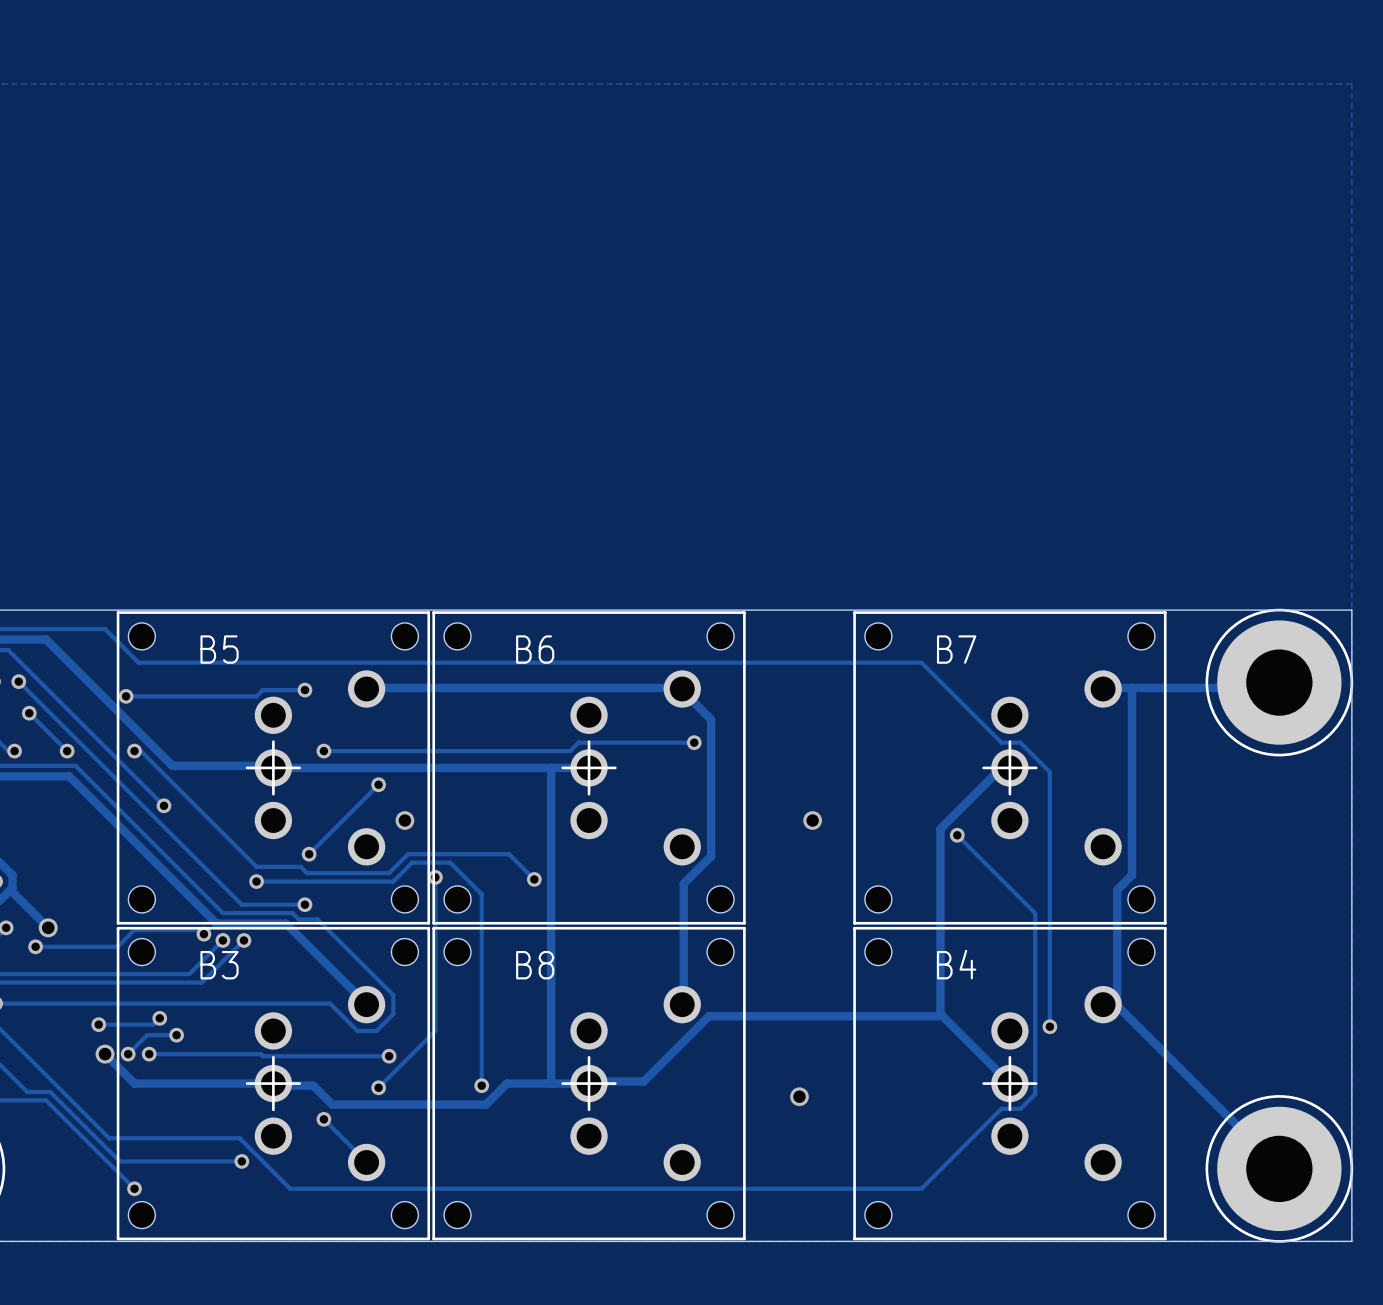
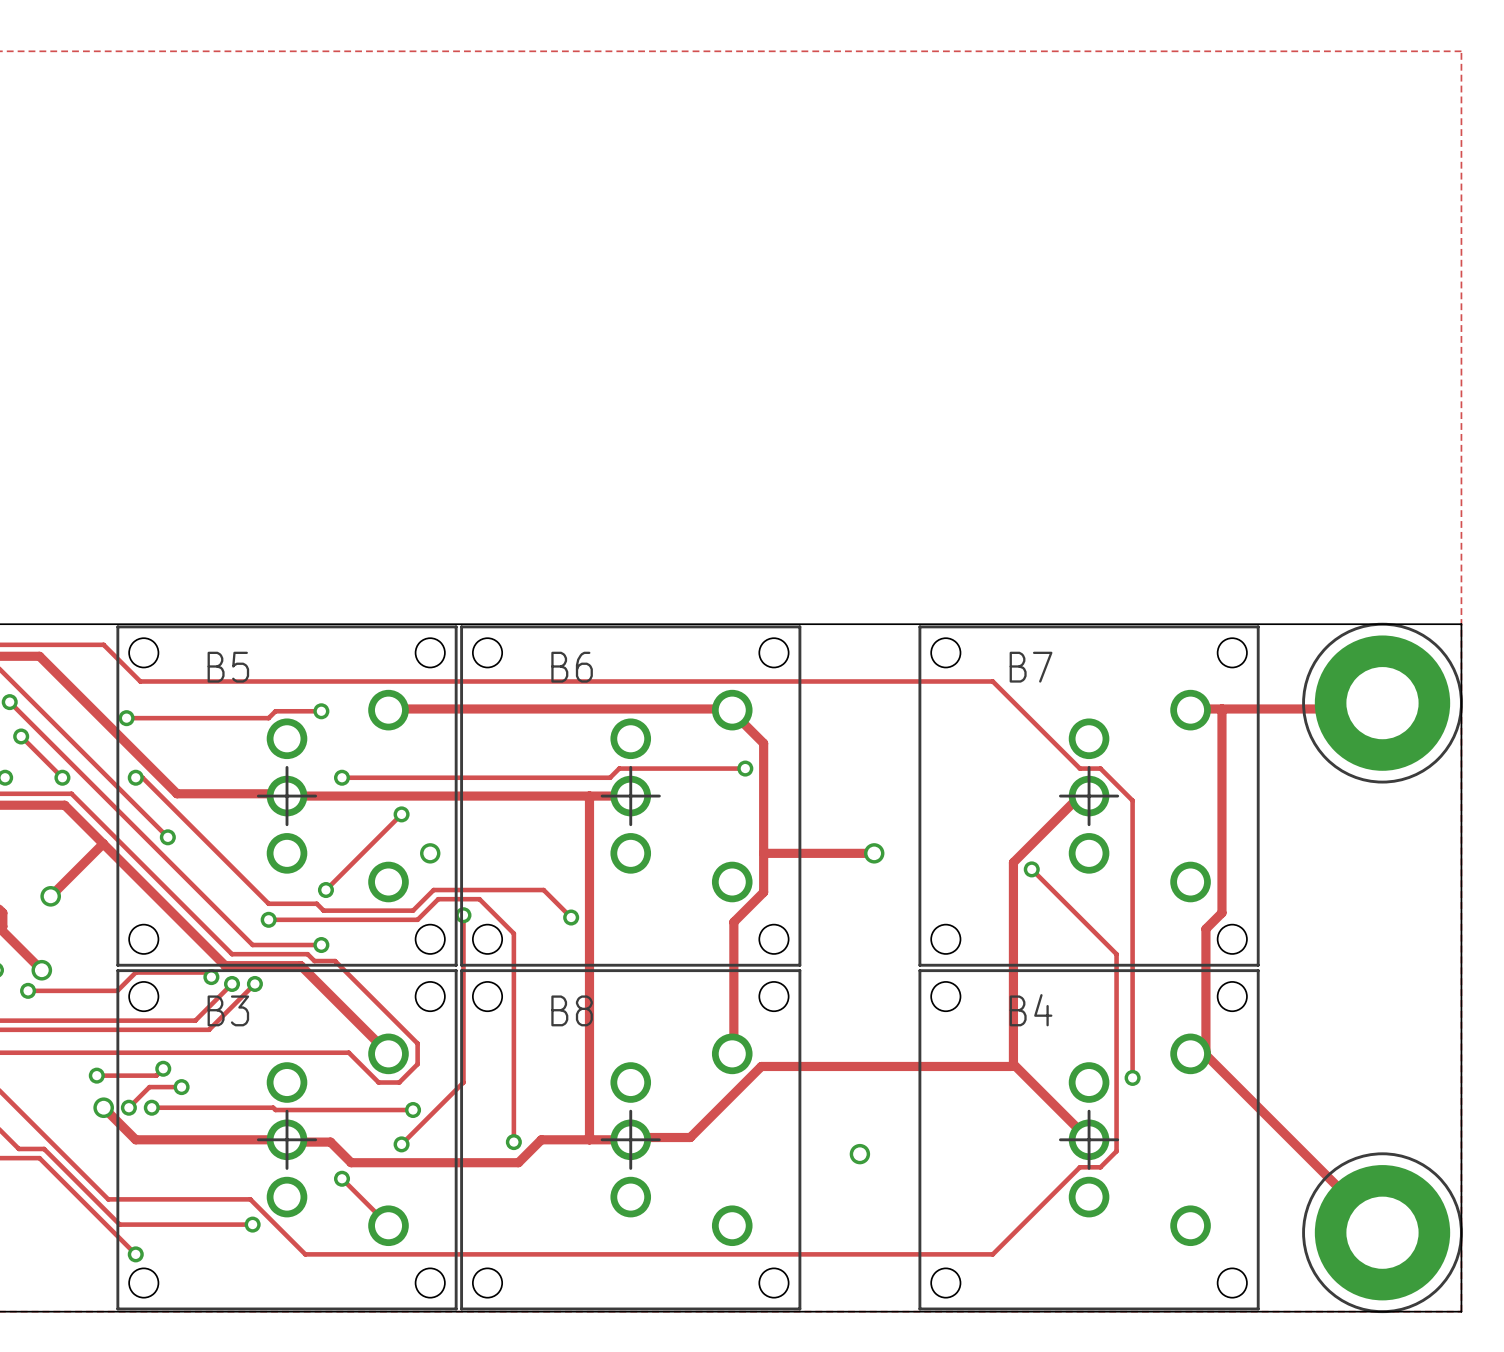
track: none -> (103, 843) (50, 896)
track: none -> (763, 853) (874, 853)
via: none -> (50, 896)

